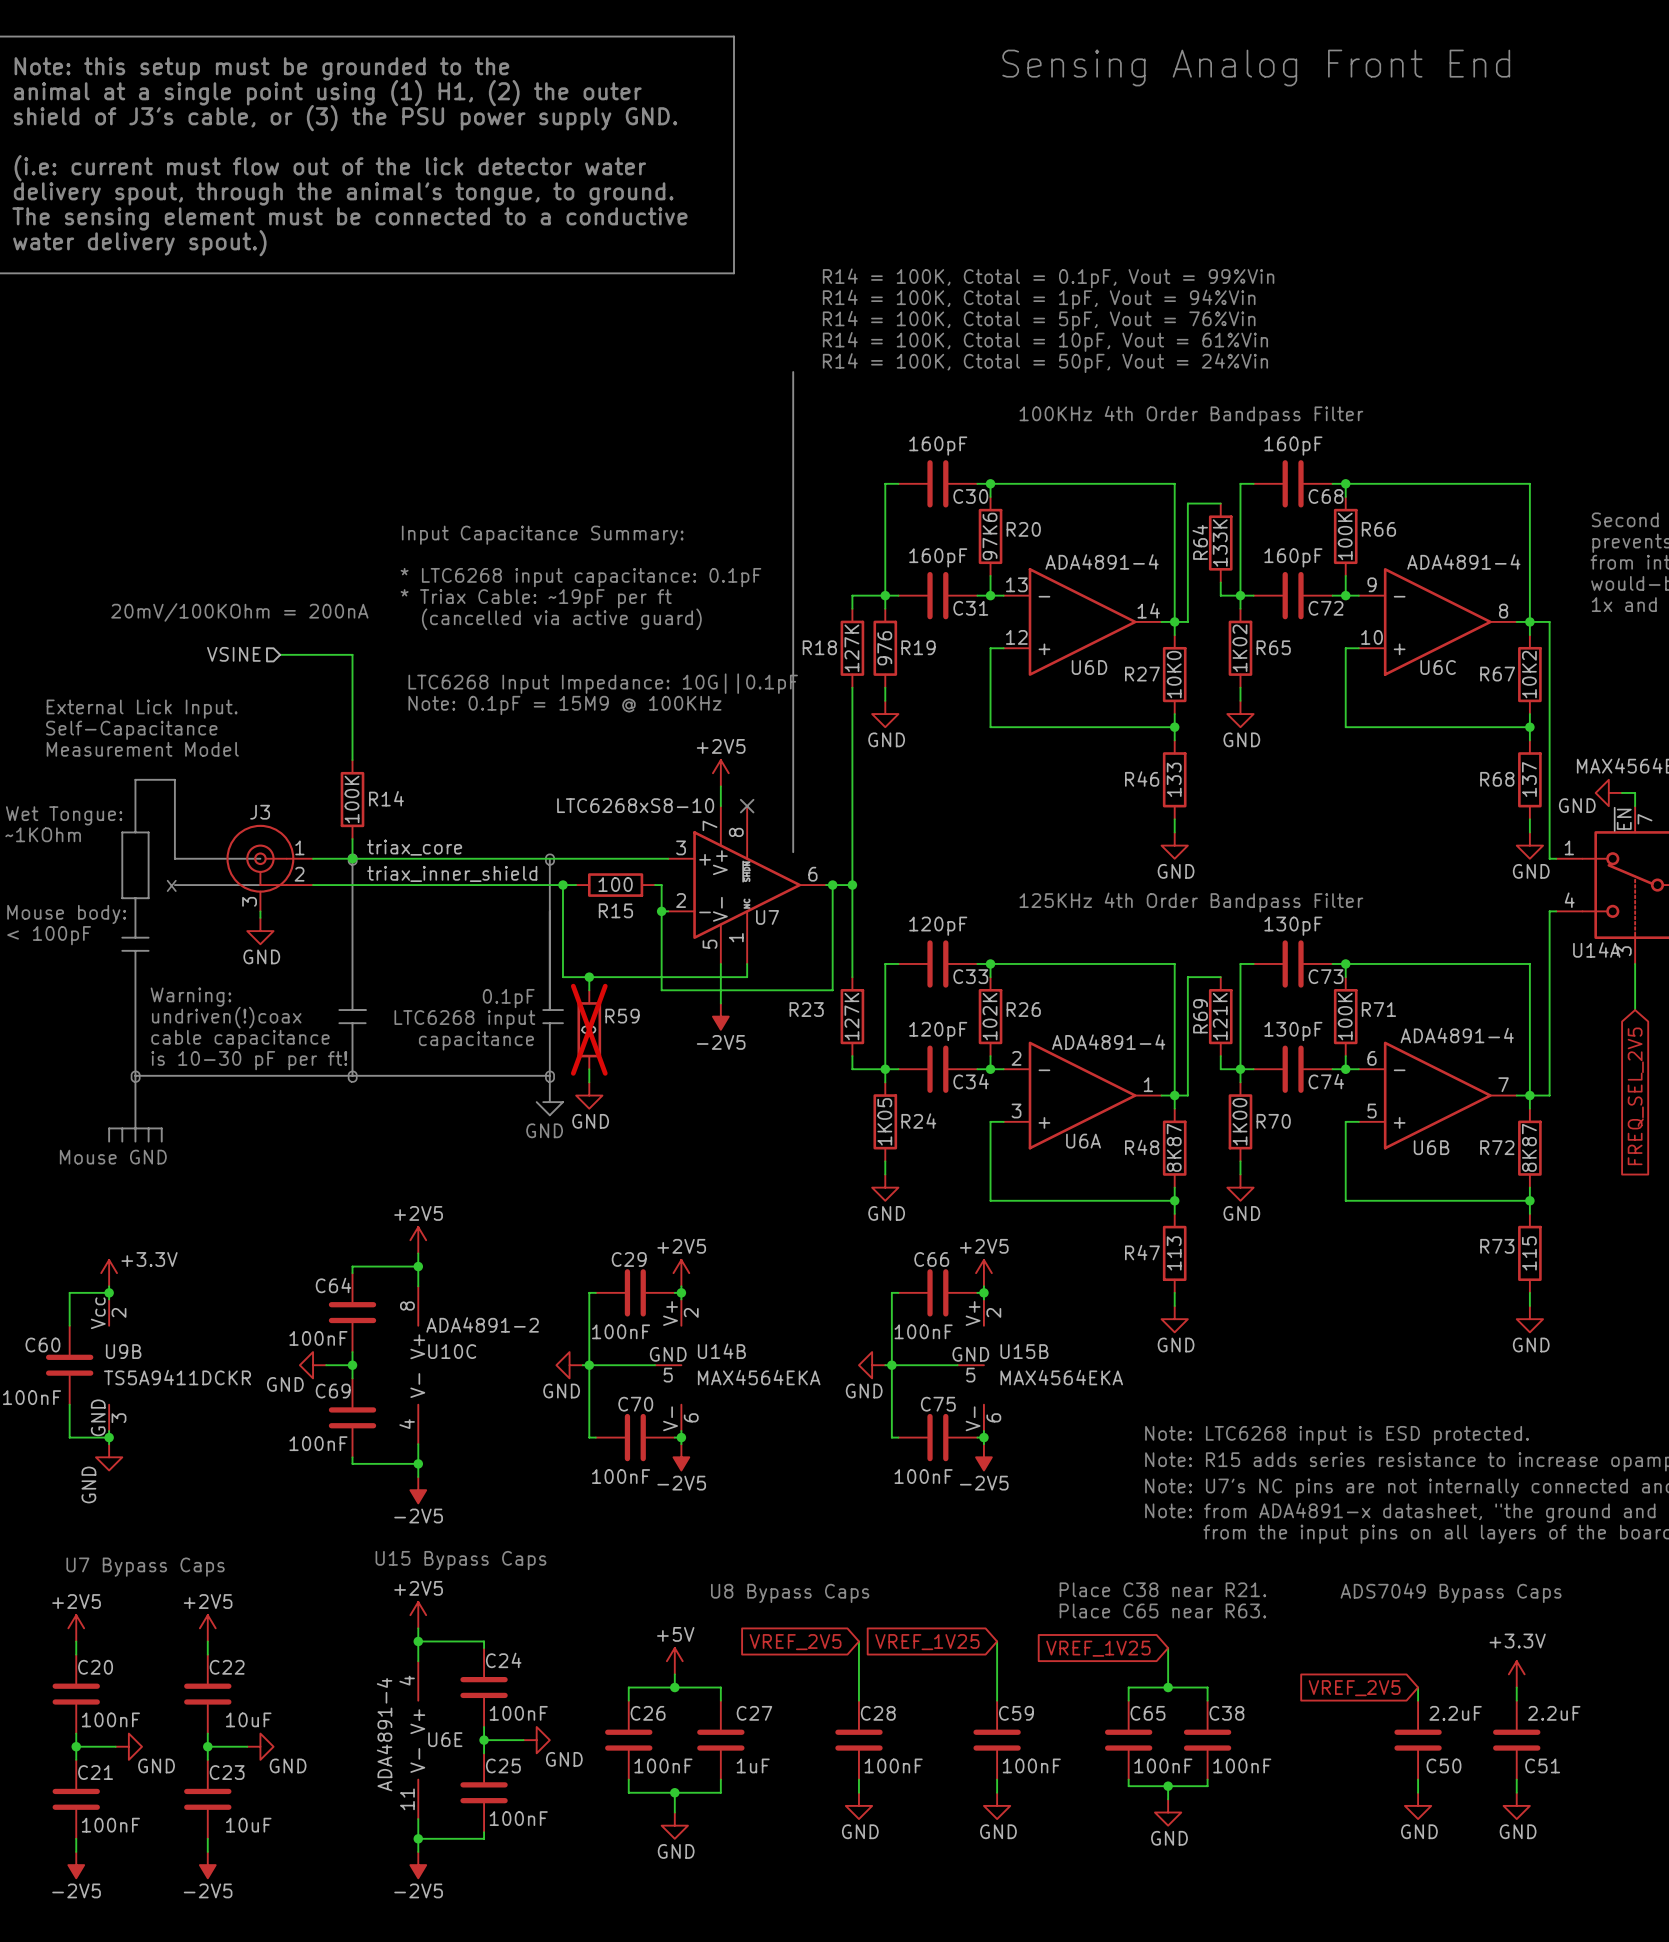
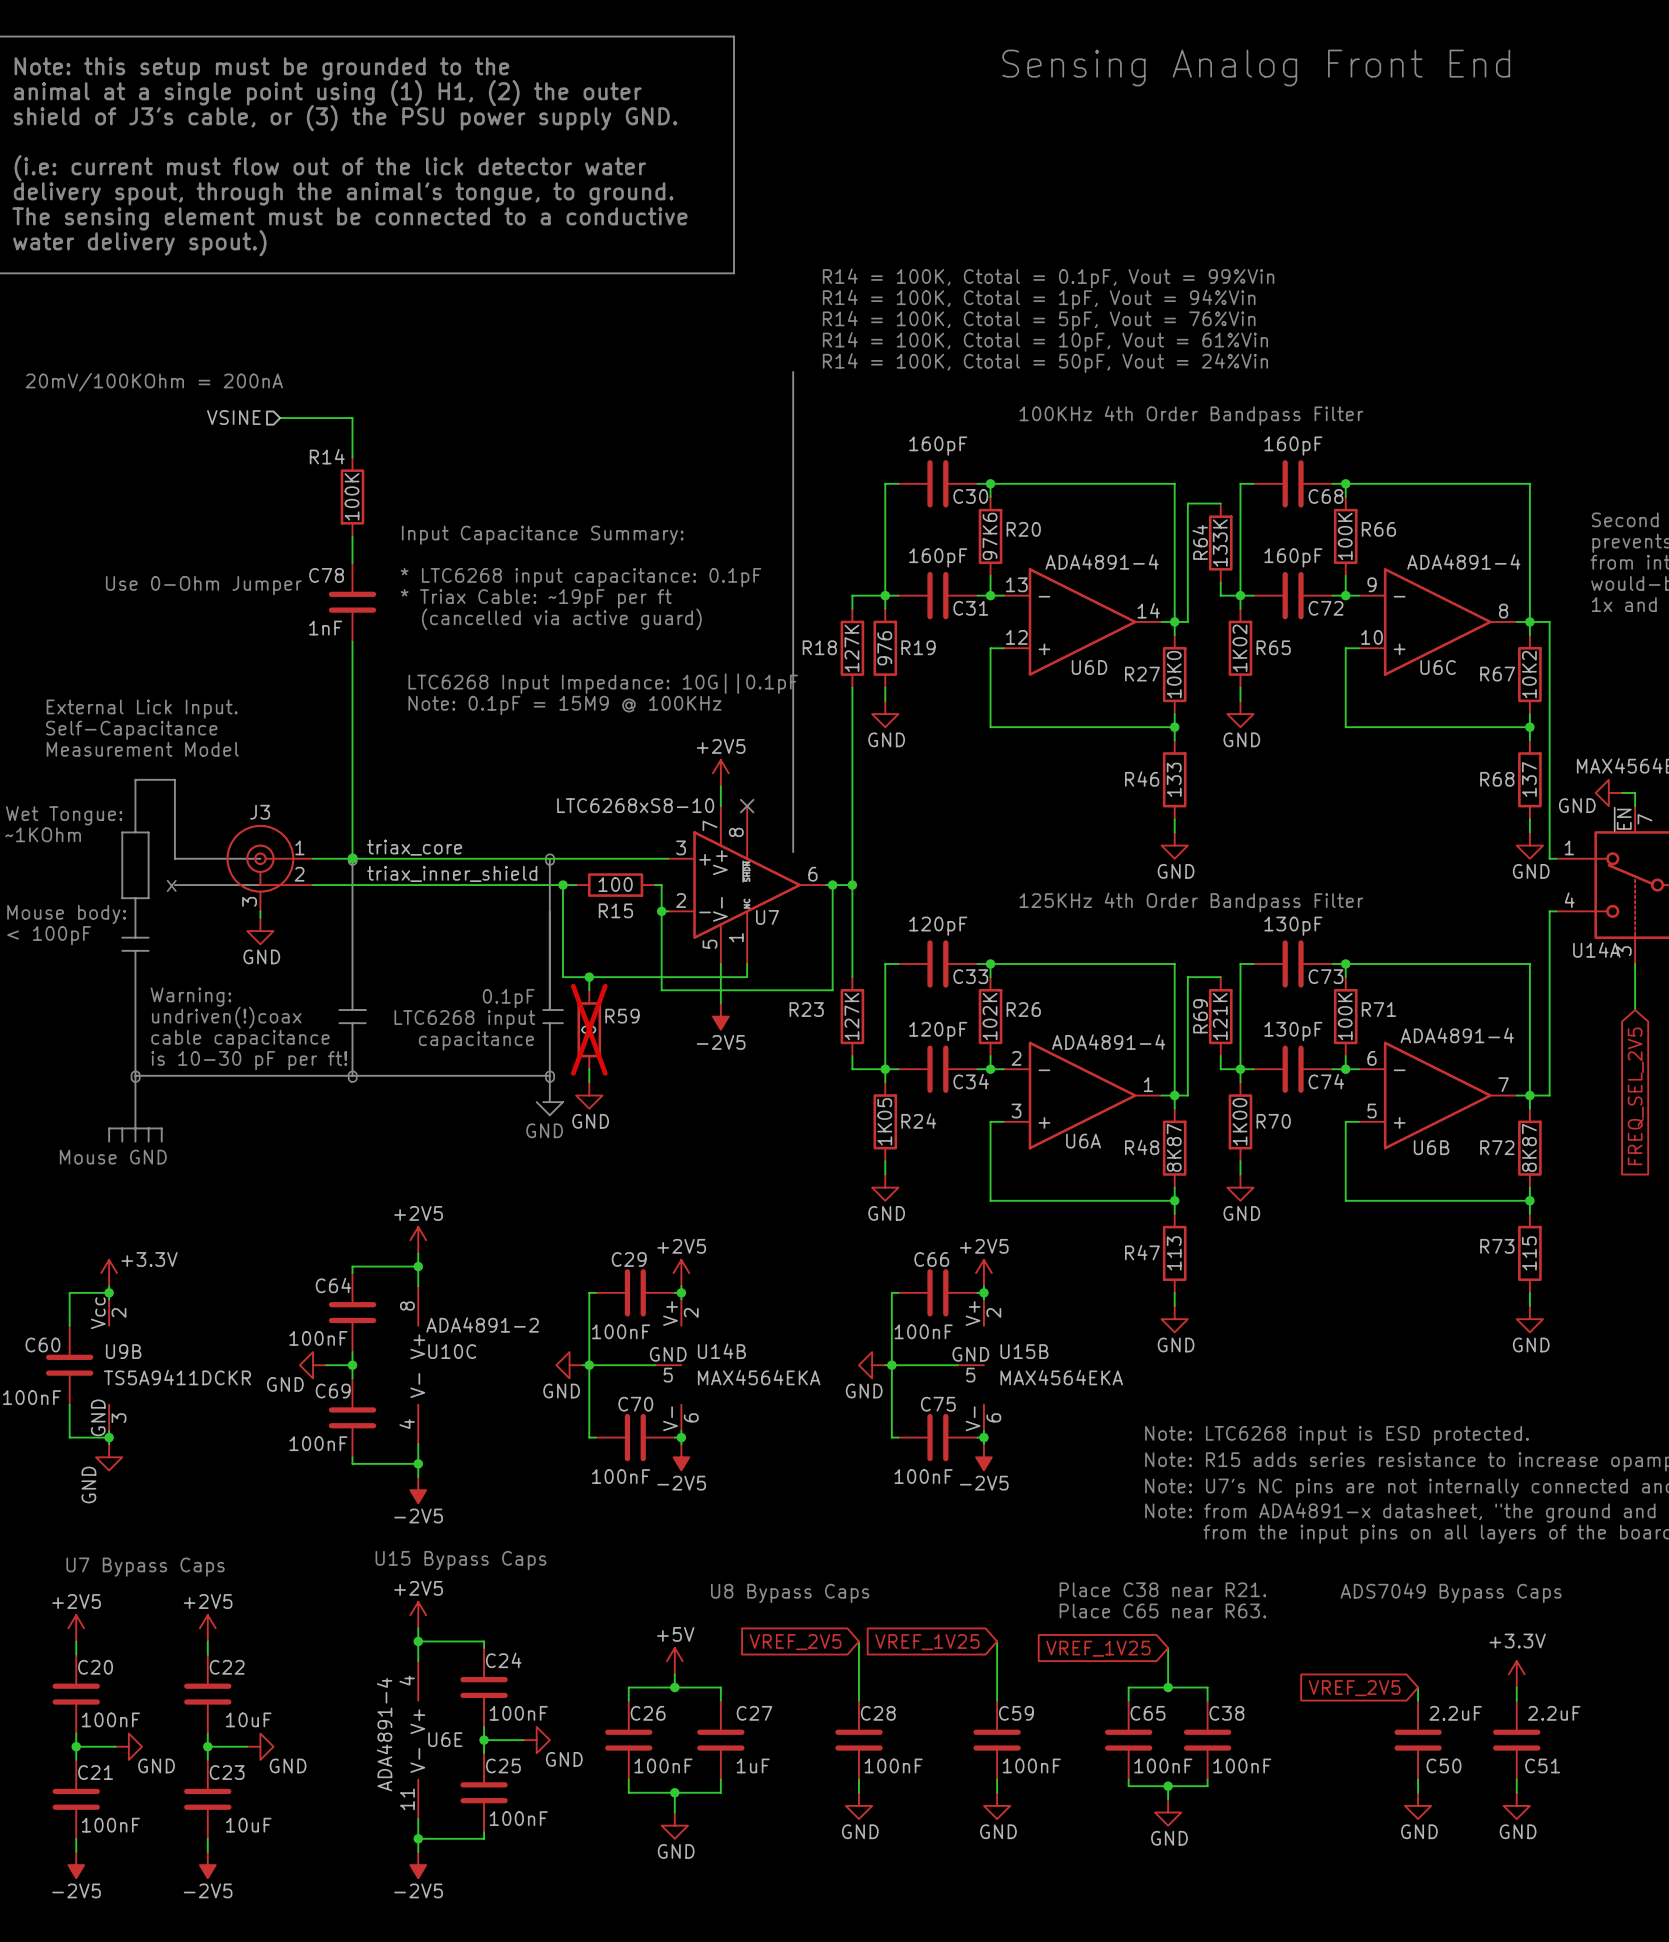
wire: none -> (280, 418) (352, 418) (352, 457)
wire: none -> (352, 536) (352, 562)
text: none -> Use 0-Ohm Jumper (203, 585)
C78: none -> 1nF (352, 602)
text position: 20mV/100KOhm = 200nA (239, 612) -> 20mV/100KOhm = 200nA (154, 382)
hierarchical label position: VSINE (233, 654) -> VSINE (233, 417)
wire: (280, 654) (352, 654) -> (352, 641) (352, 654)
R14 name position: R14 (386, 798) -> R14 (327, 456)
R14 position: (352, 799) -> (352, 496)

